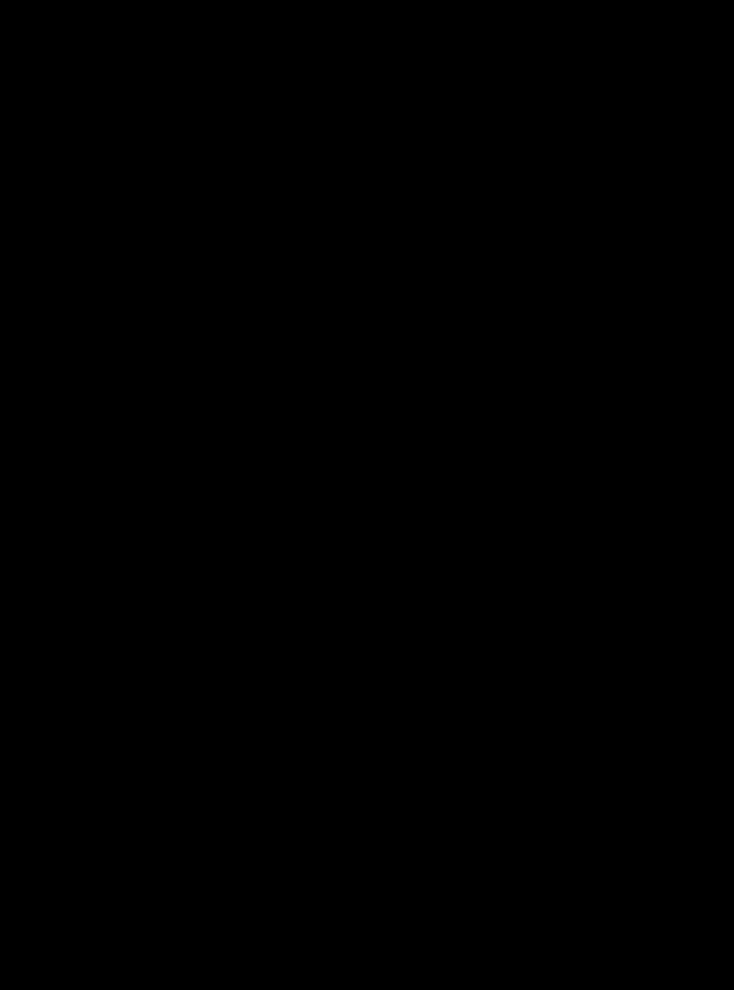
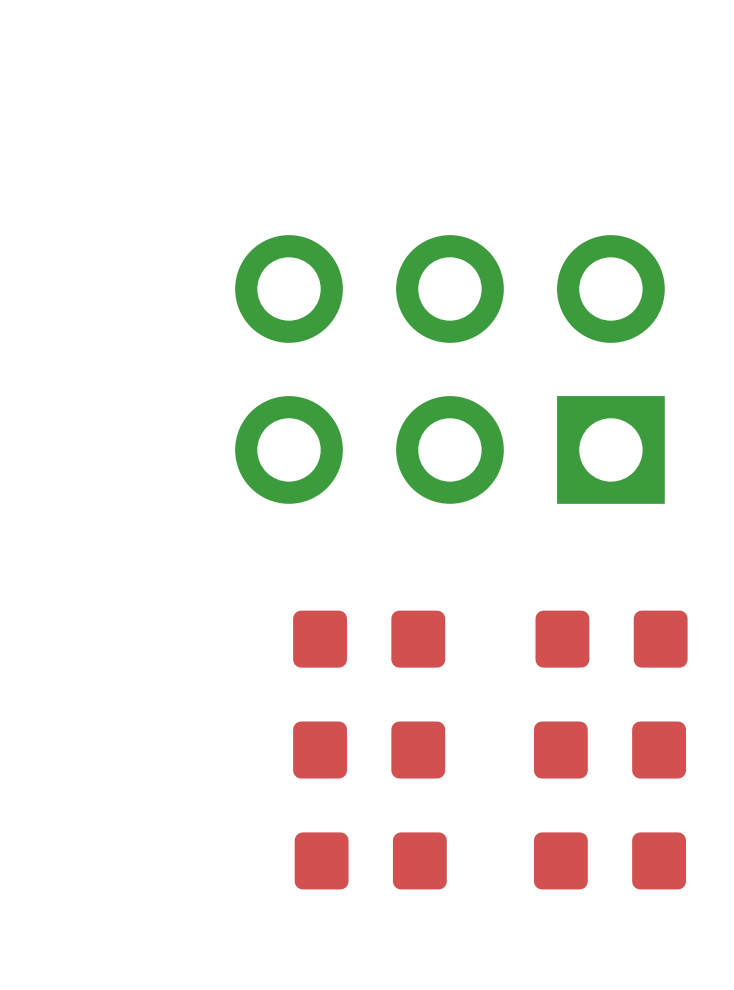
part: none -> (449, 369)
part: none -> (369, 639)
part: none -> (611, 639)
part: none -> (369, 750)
part: none -> (609, 750)
part: none -> (370, 860)
part: none -> (609, 860)

